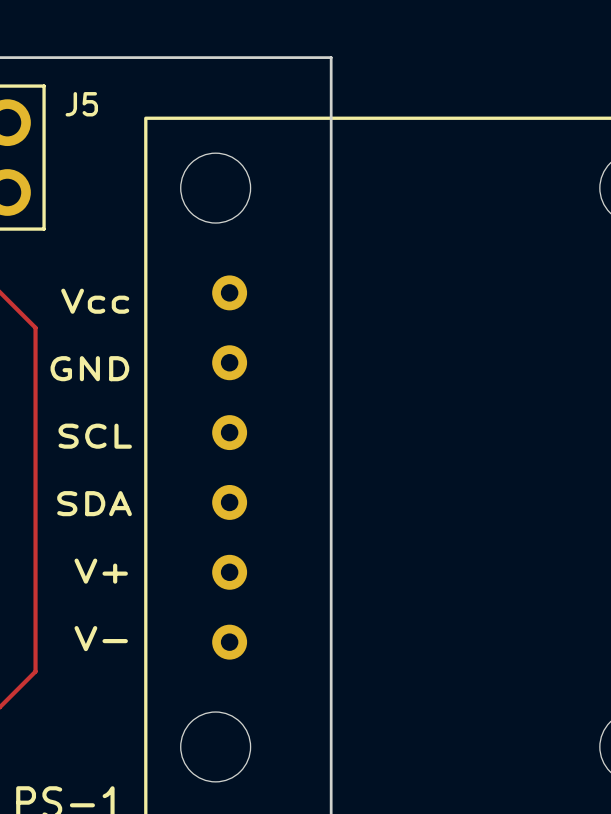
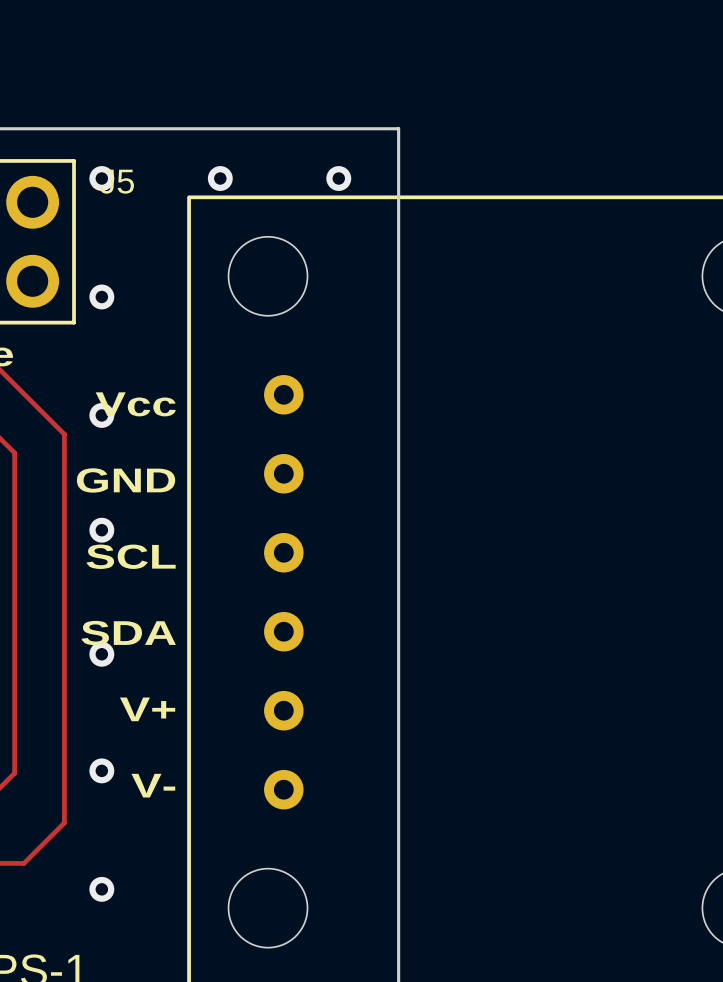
via: none -> (101, 178)
via: none -> (220, 178)
via: none -> (338, 178)
via: none -> (101, 296)
via: none -> (101, 415)
via: none -> (101, 530)
via: none -> (101, 654)
via: none -> (101, 770)
via: none -> (101, 889)

